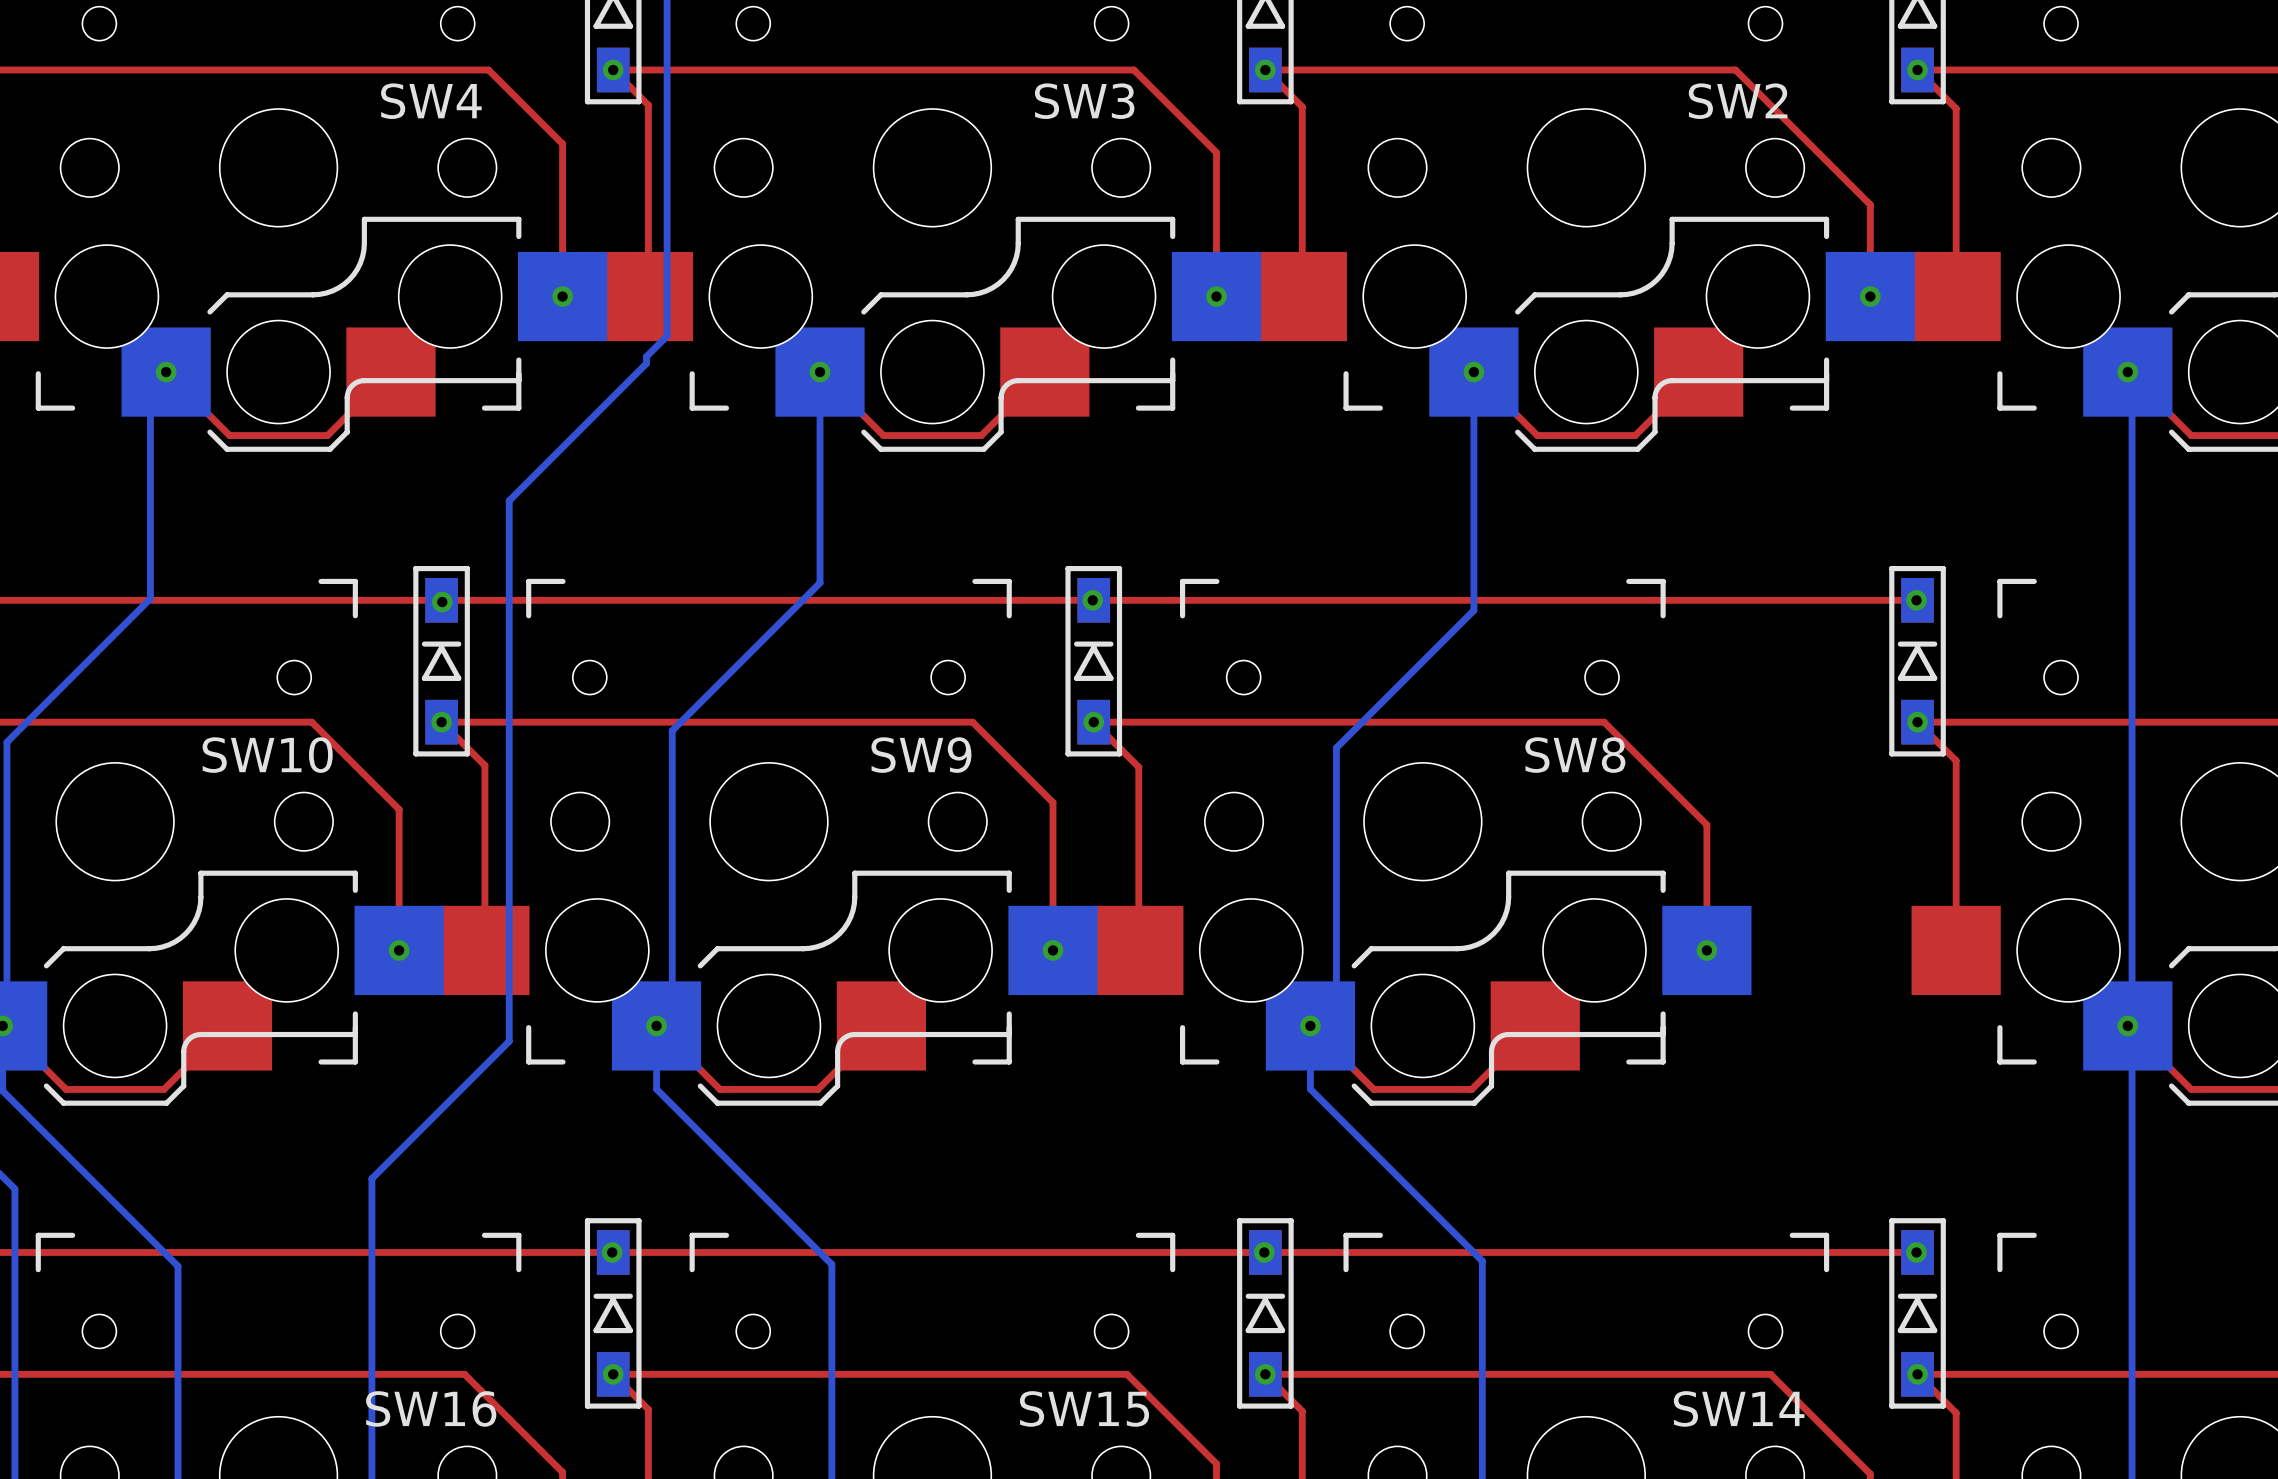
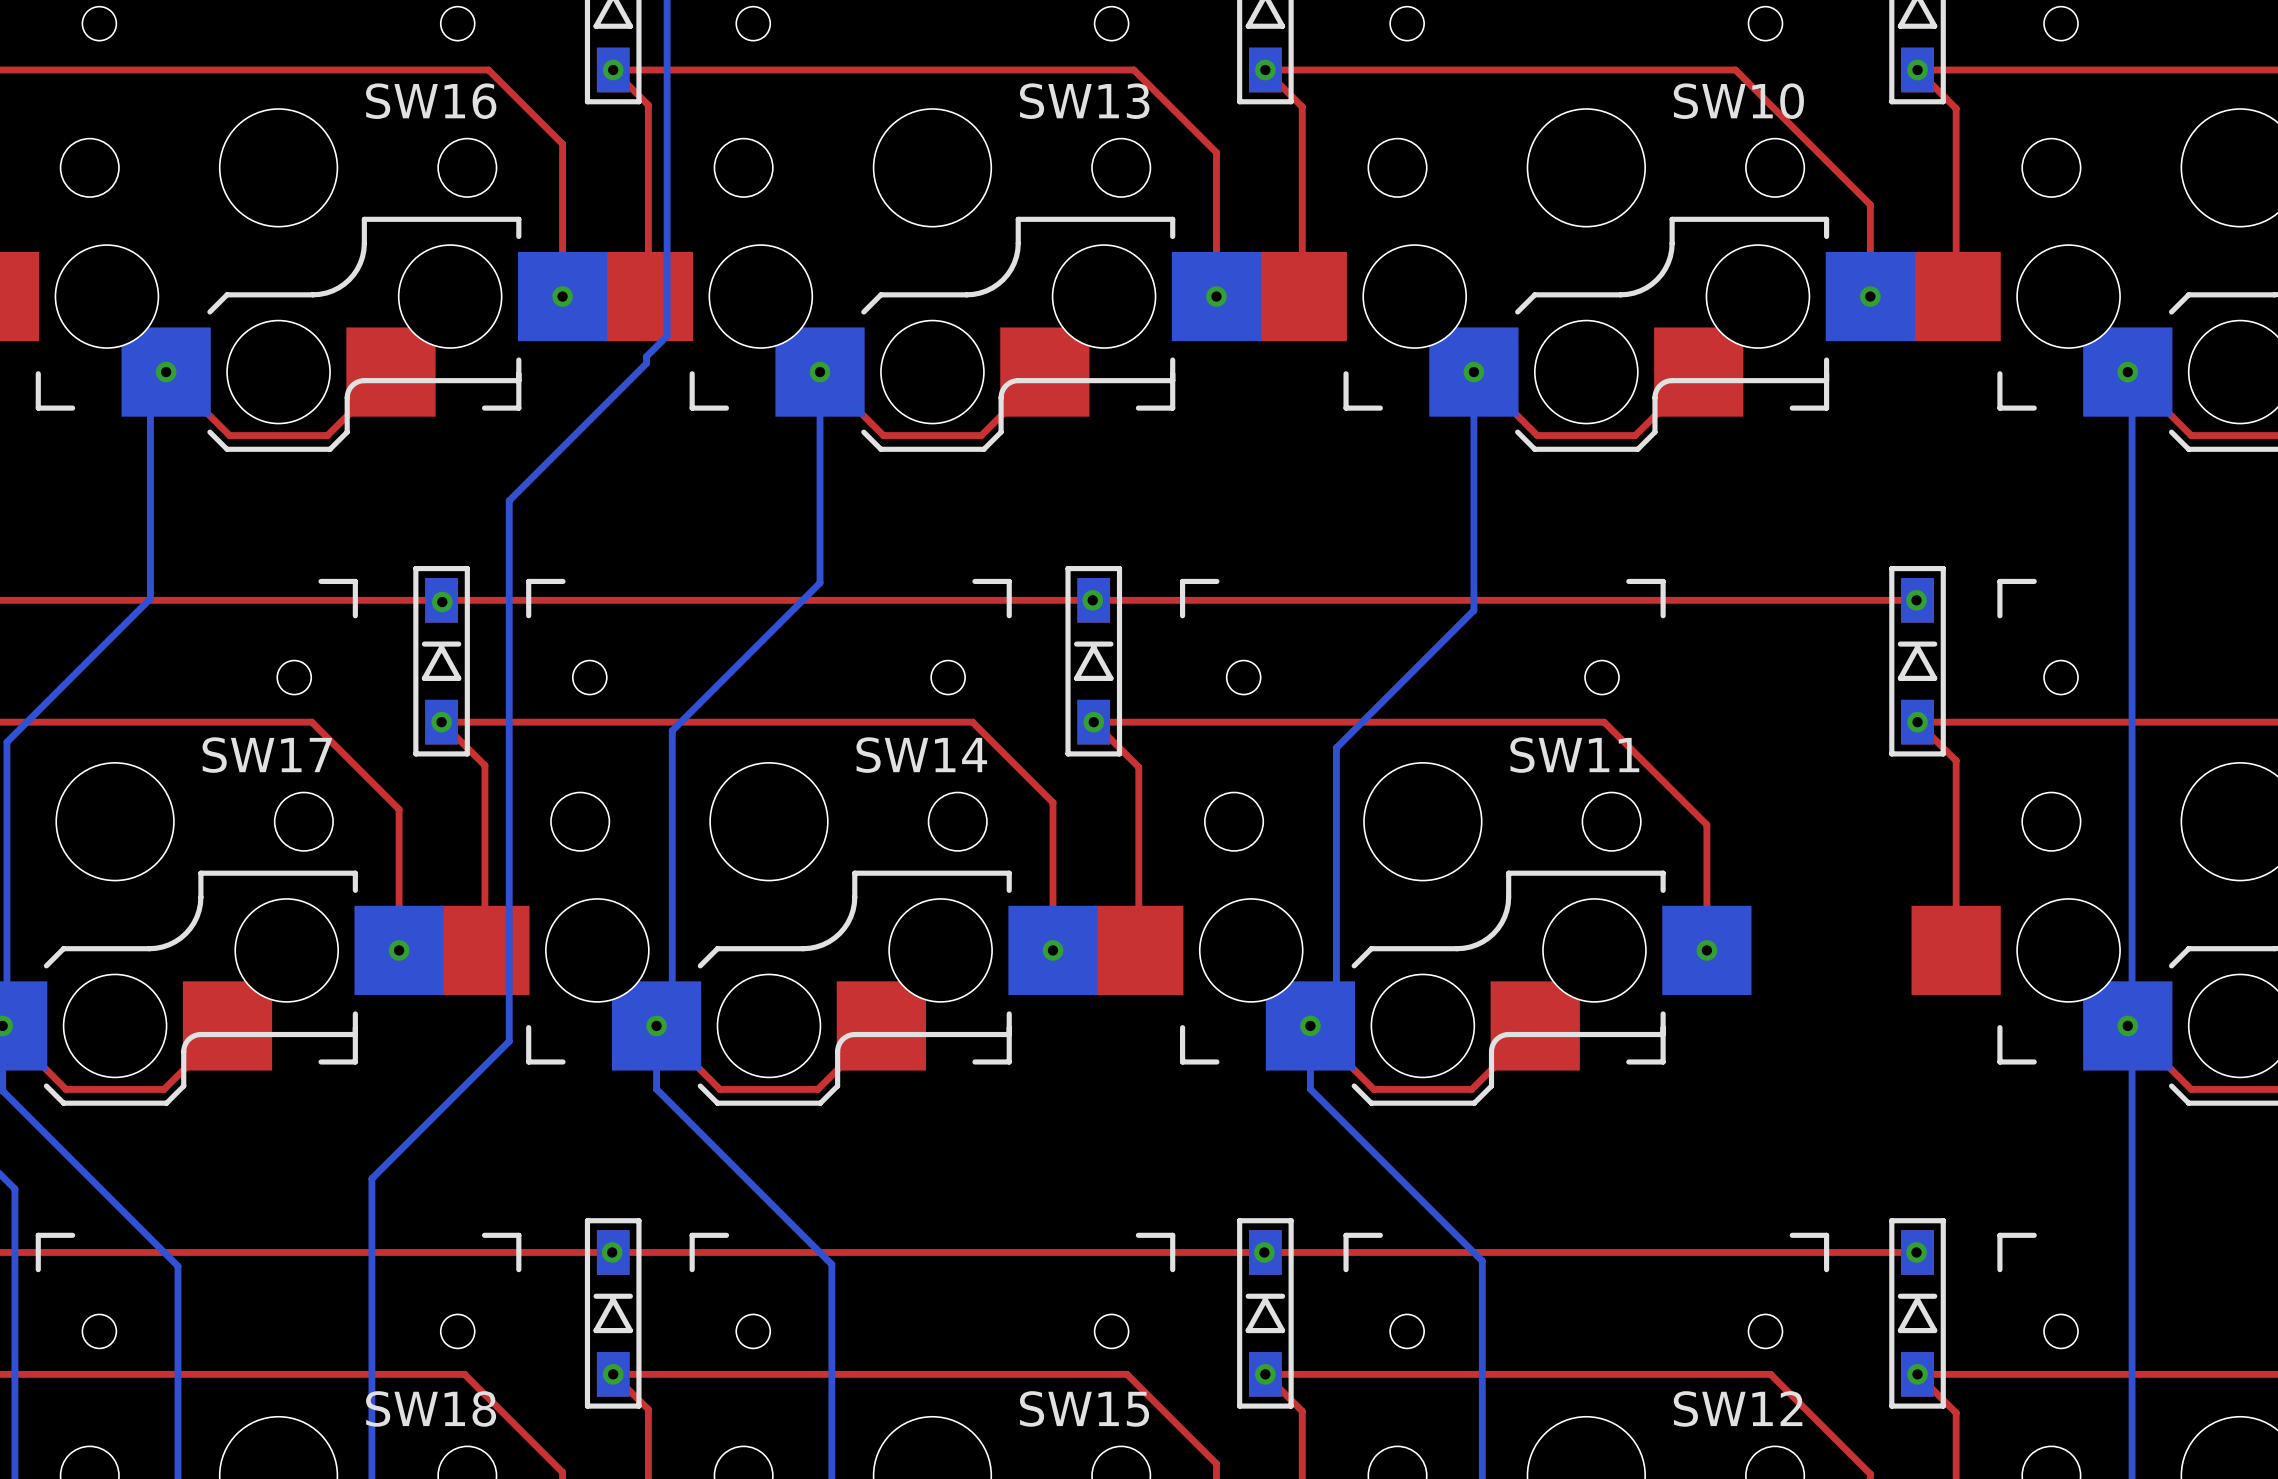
SW4 name: SW4 (431, 101) -> SW16 (431, 101)
SW3 name: SW3 (1084, 101) -> SW13 (1084, 101)
SW2 name: SW2 (1738, 101) -> SW10 (1738, 101)
SW10 name: SW10 (267, 755) -> SW17 (267, 755)
SW9 name: SW9 (921, 755) -> SW14 (921, 755)
SW8 name: SW8 (1575, 755) -> SW11 (1574, 755)
SW16 name: SW16 (431, 1408) -> SW18 (431, 1408)
SW14 name: SW14 (1739, 1408) -> SW12 (1738, 1408)

